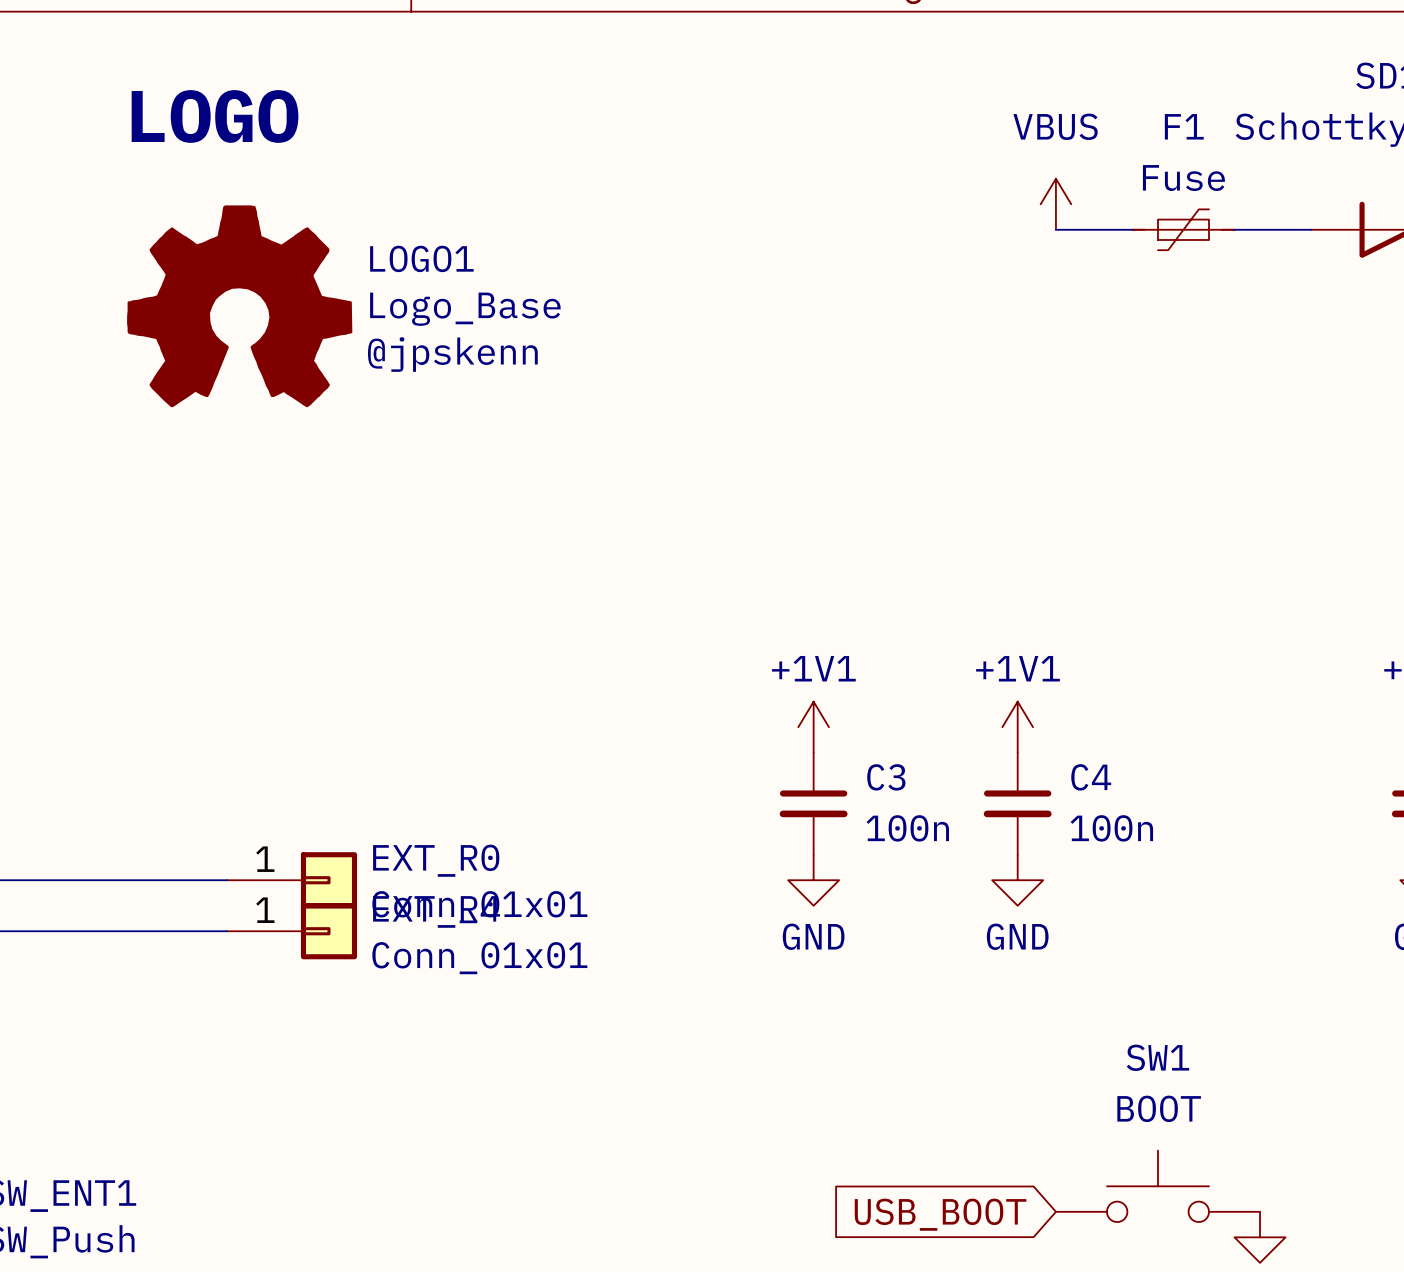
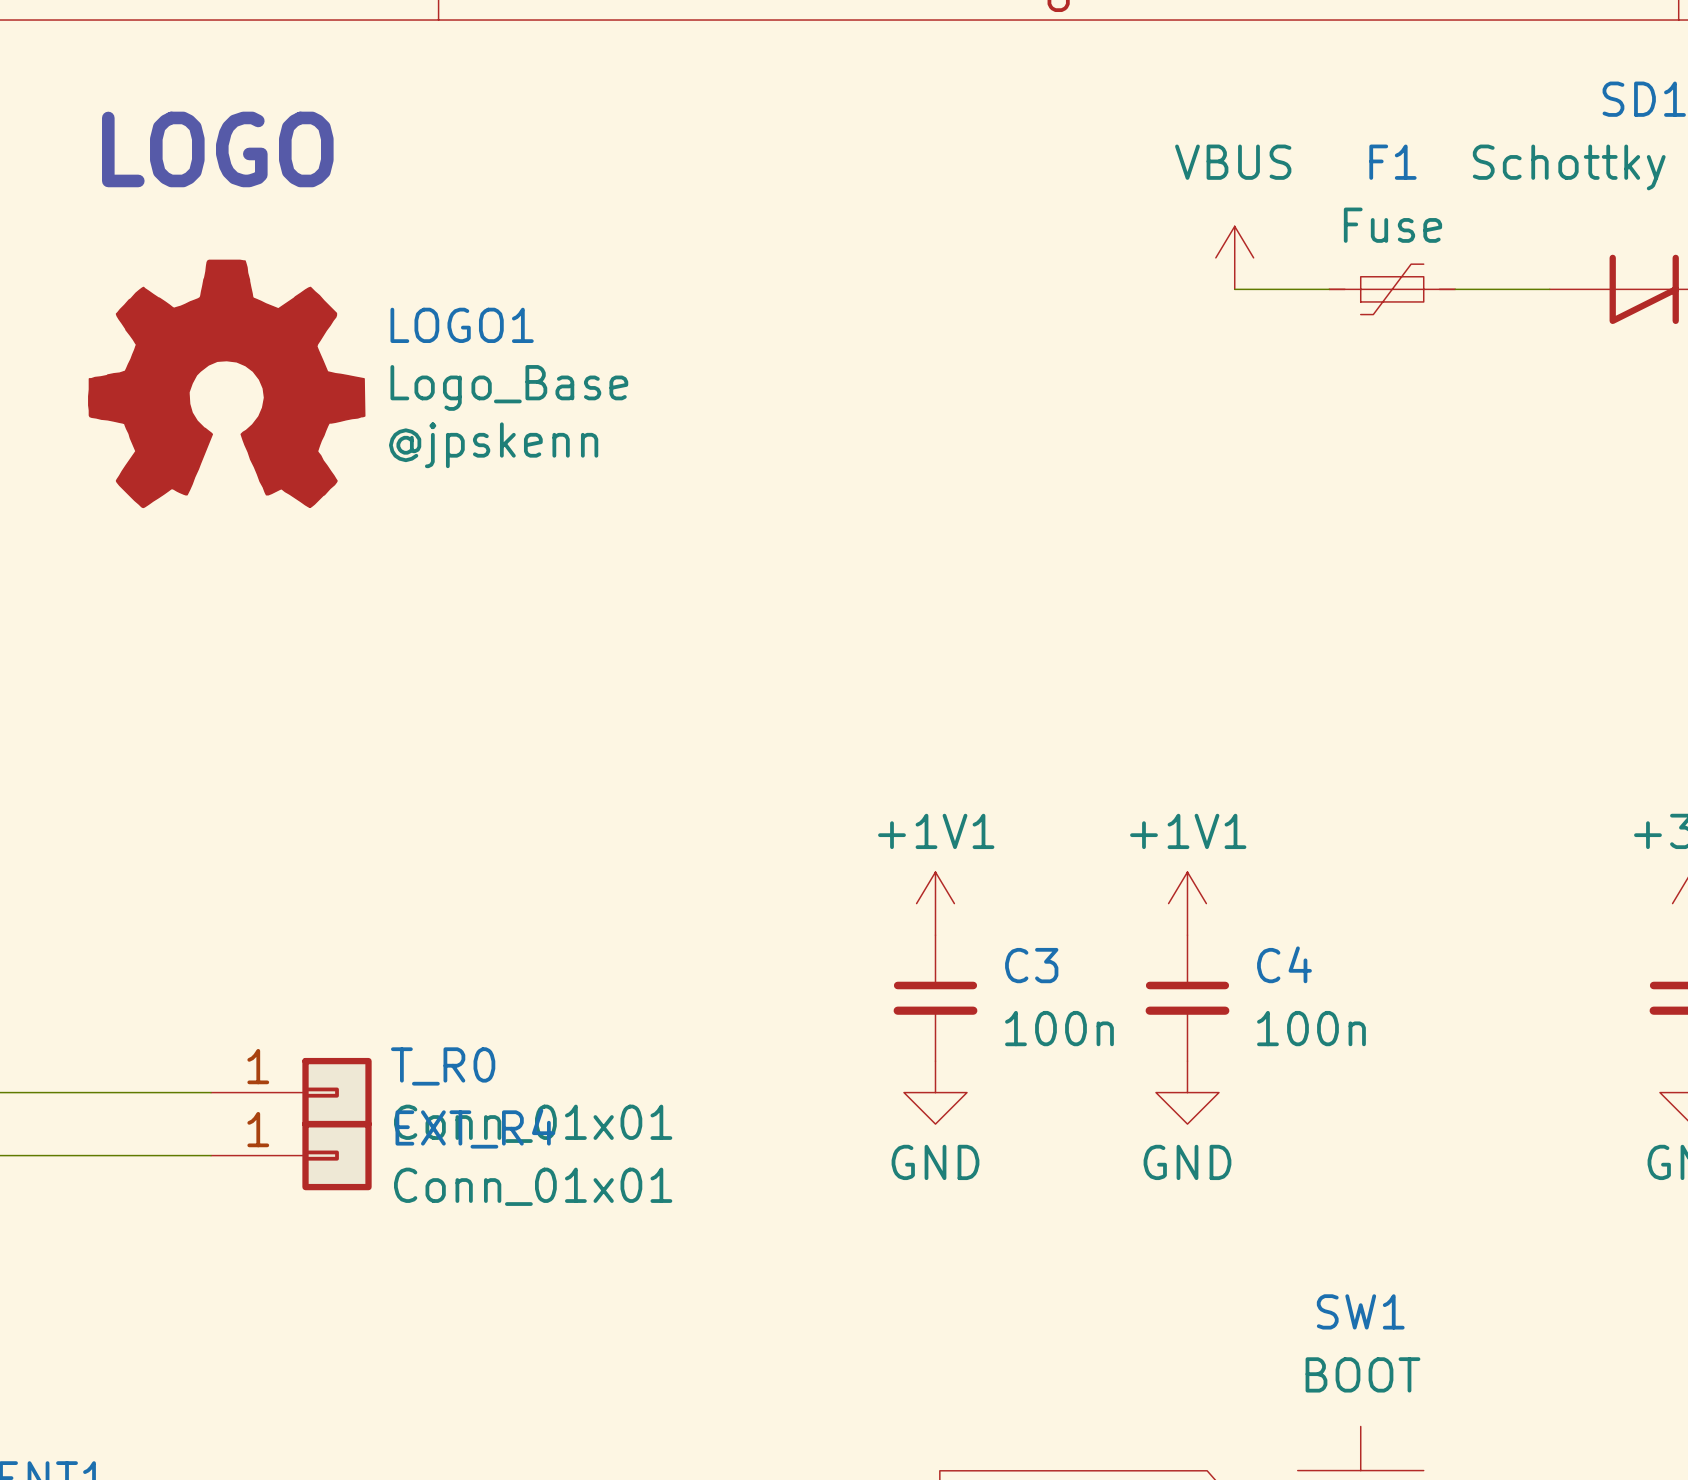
EXT_R0 name: EXT_R0 (436, 860) -> T_R0 (443, 1066)

